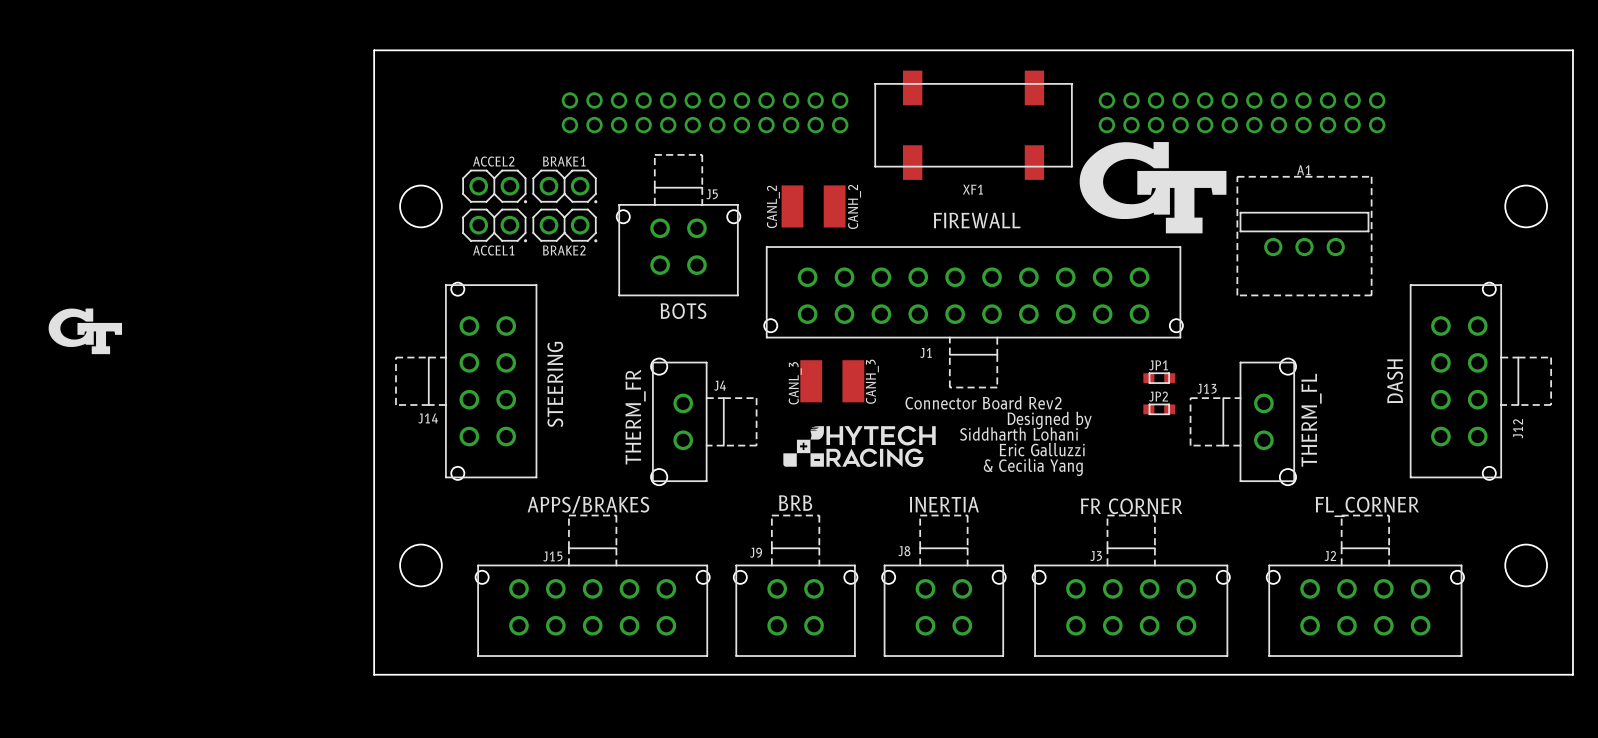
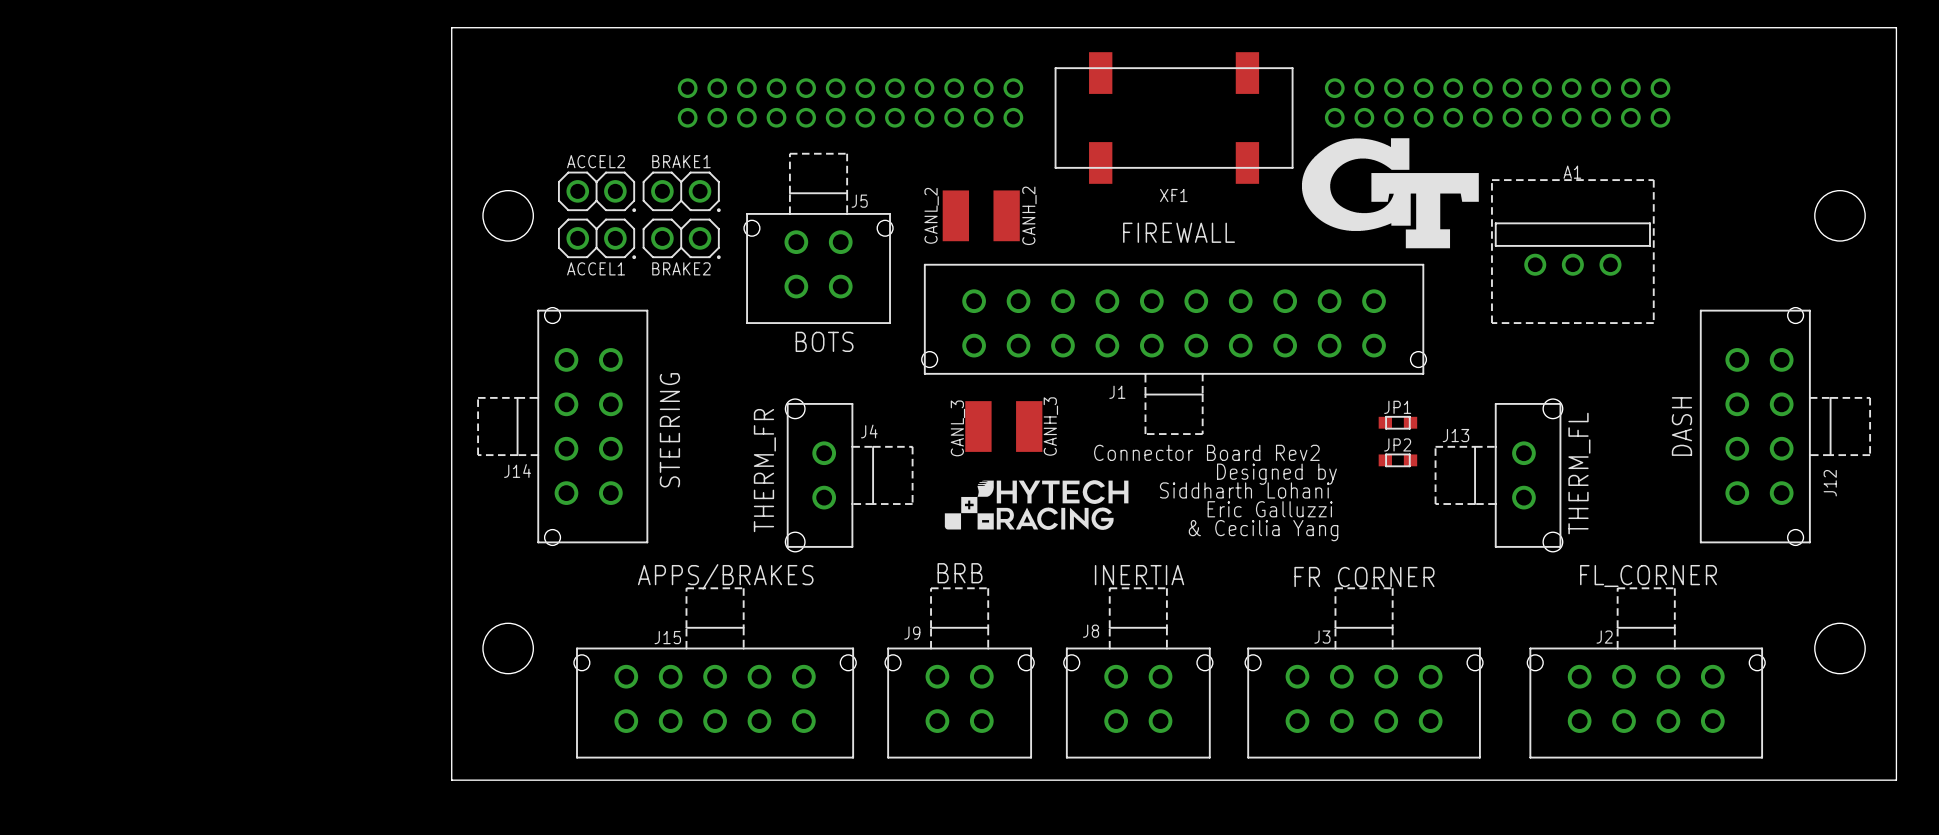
drawing: [48, 308, 123, 355] -> none

